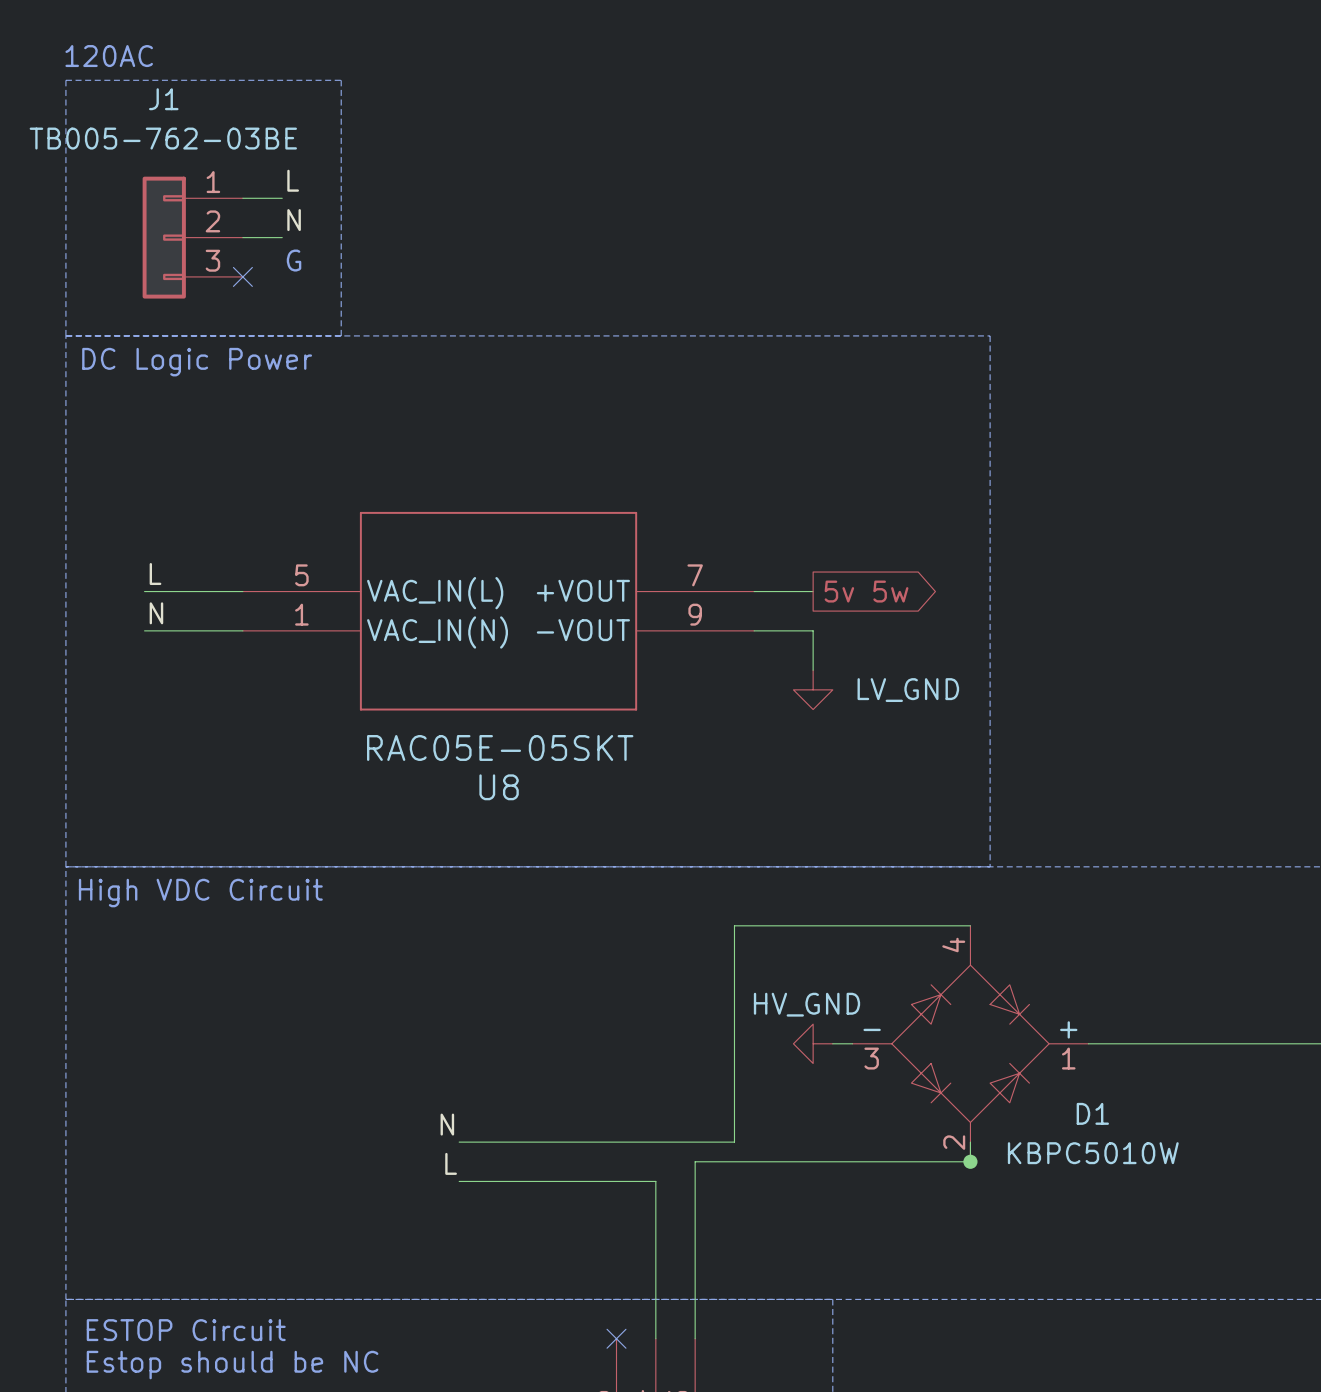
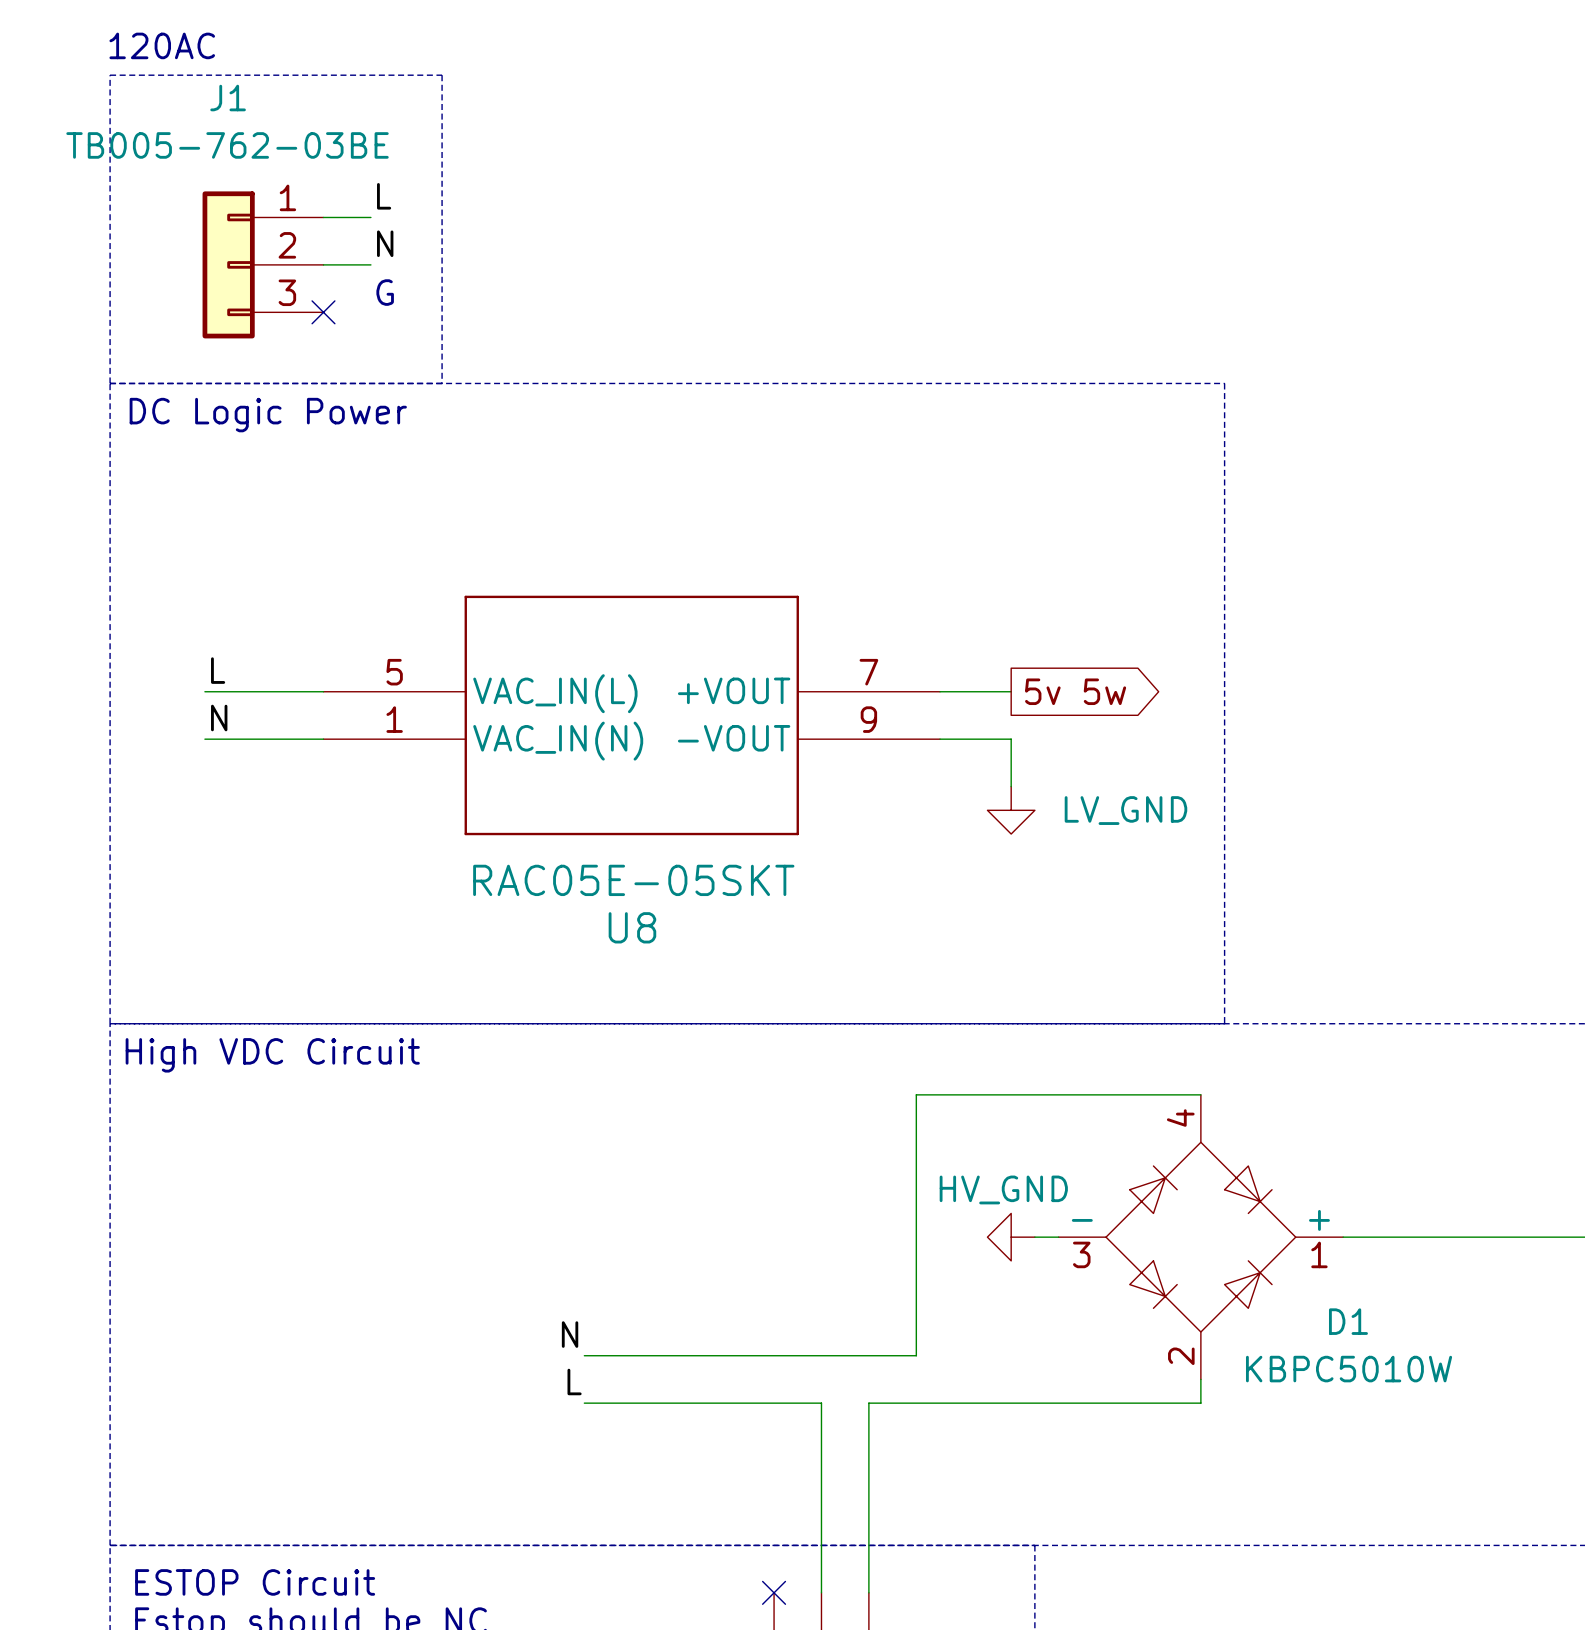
wire: (970, 1142) (970, 1161) (695, 1161) (695, 1181) -> (1200, 1379) (1200, 1403) (868, 1403)
junction: (970, 1161) -> none

